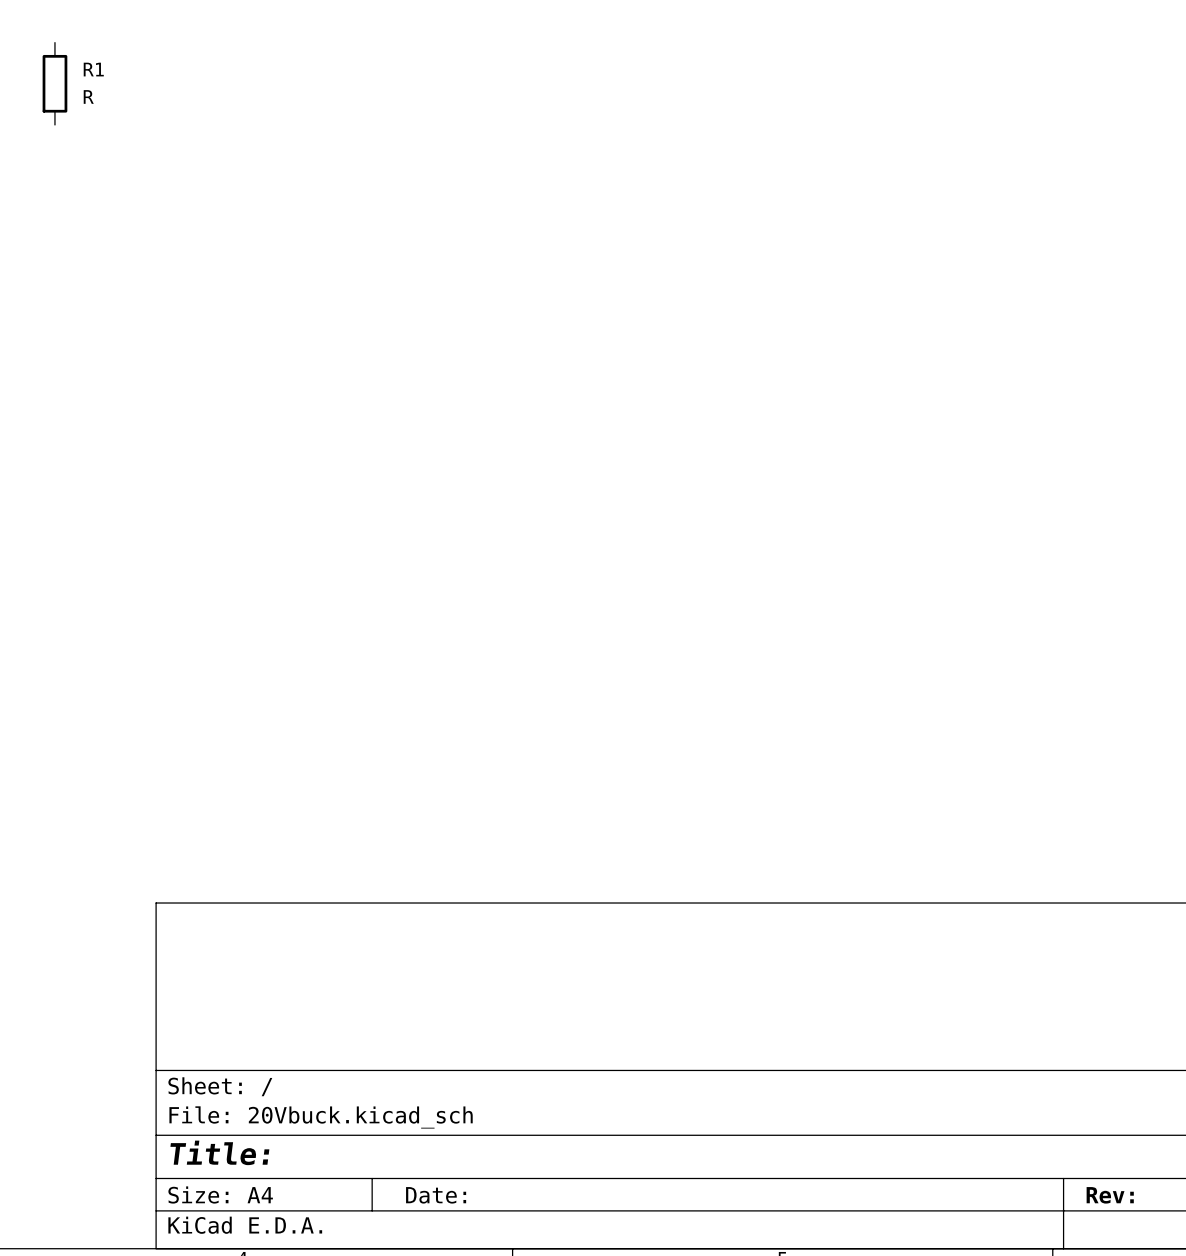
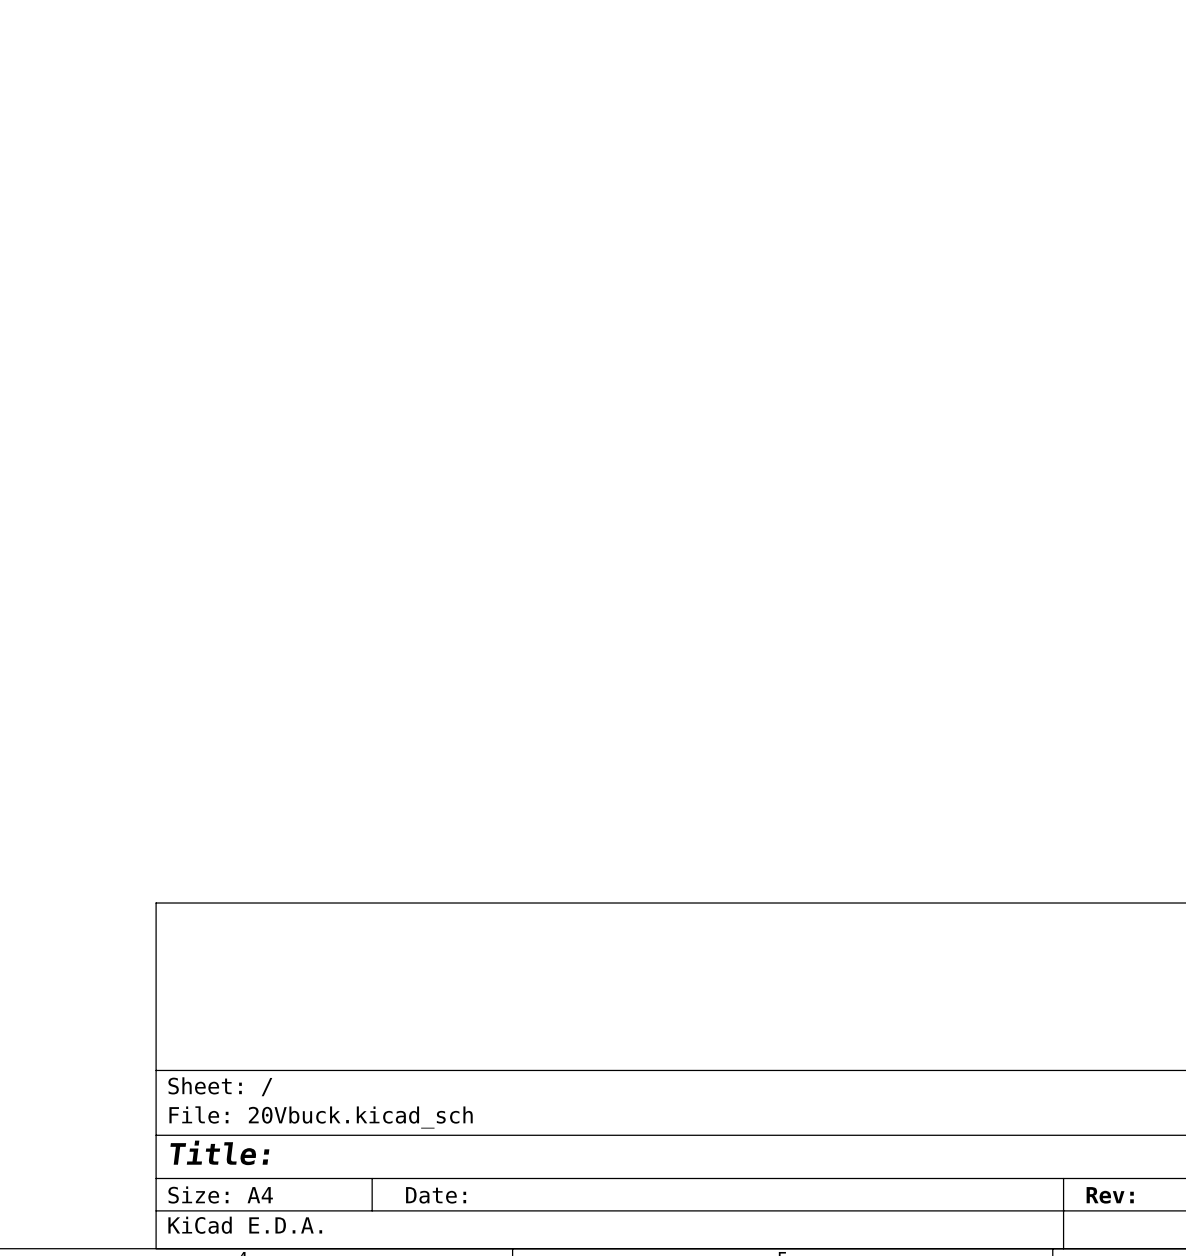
R1: R (54, 83) -> none

